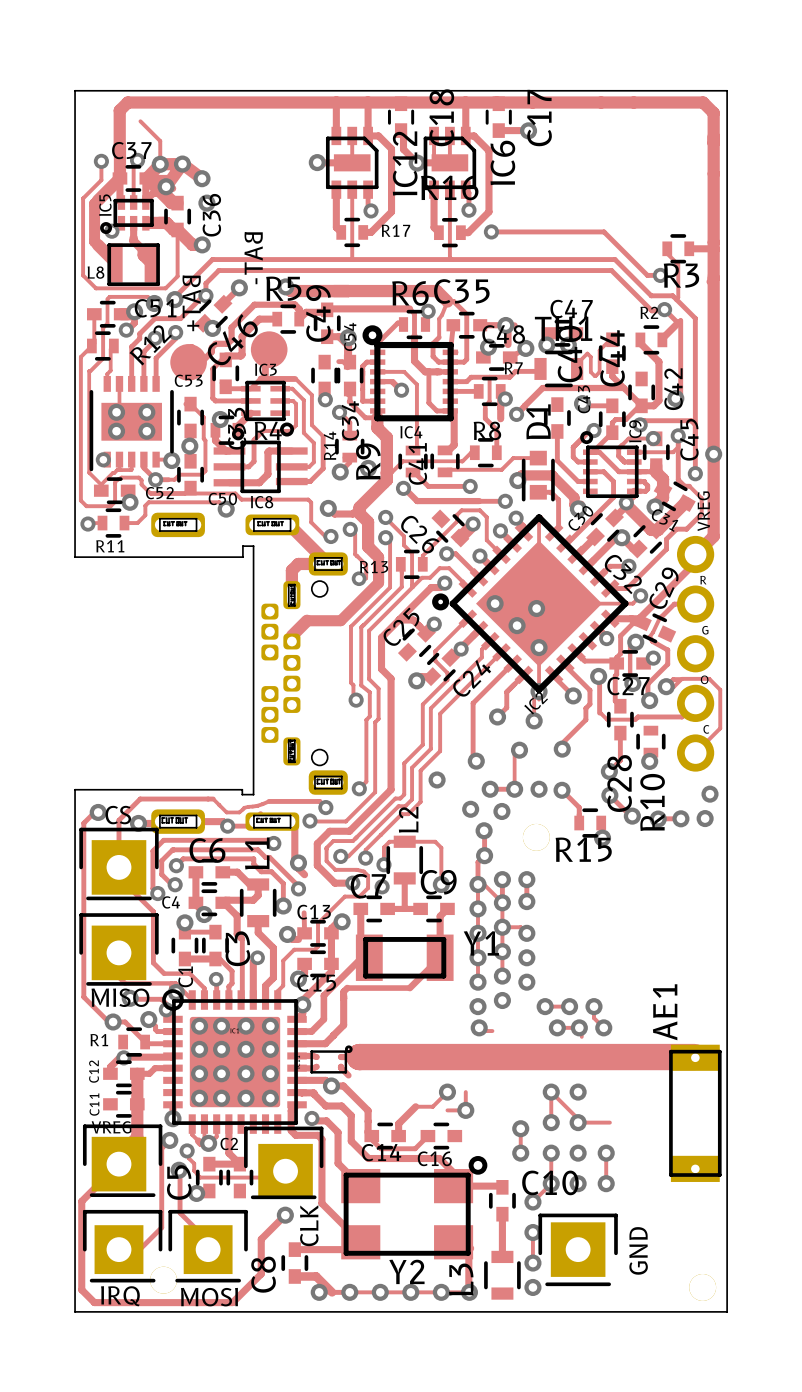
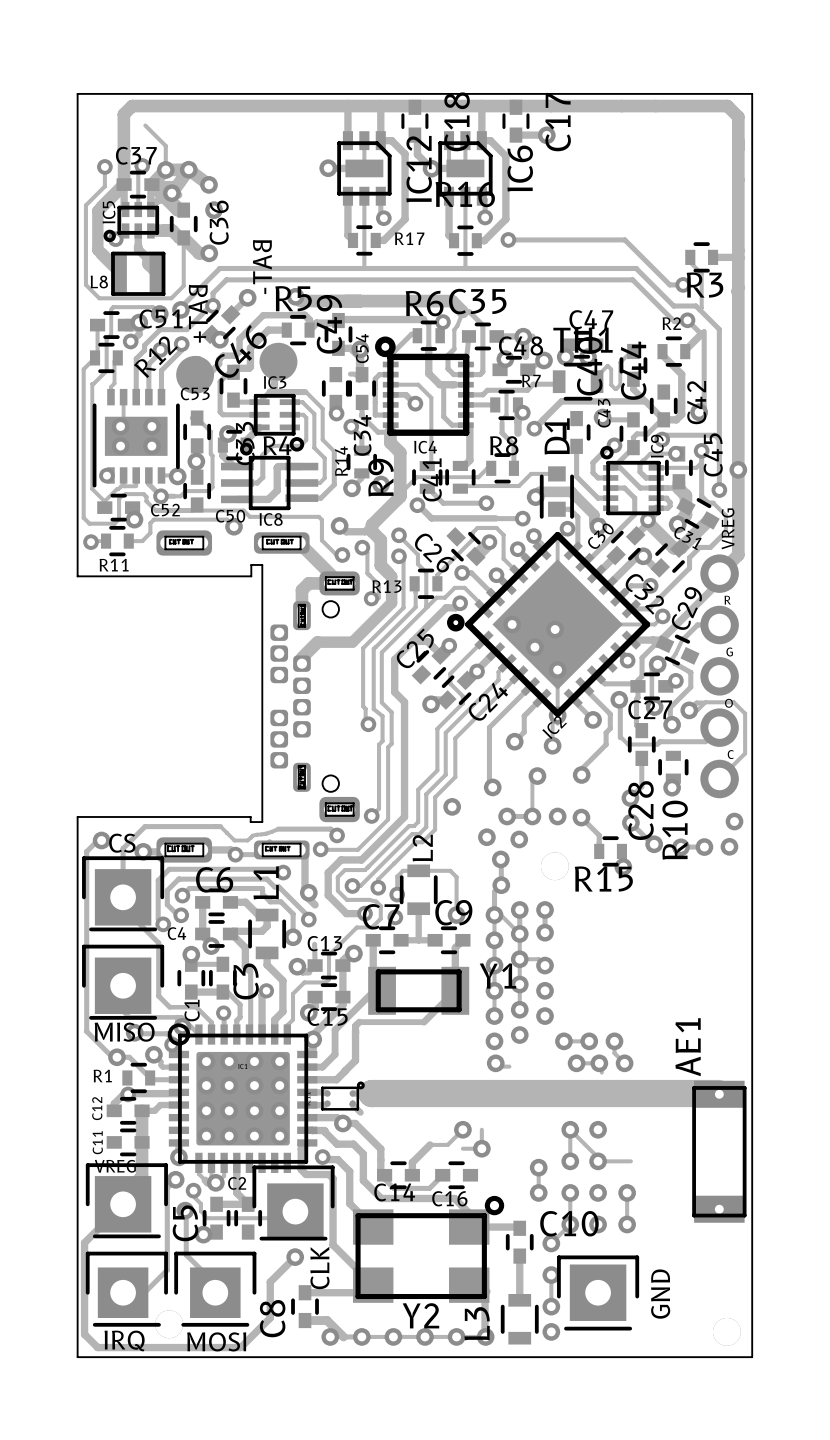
via: none -> (567, 528)

